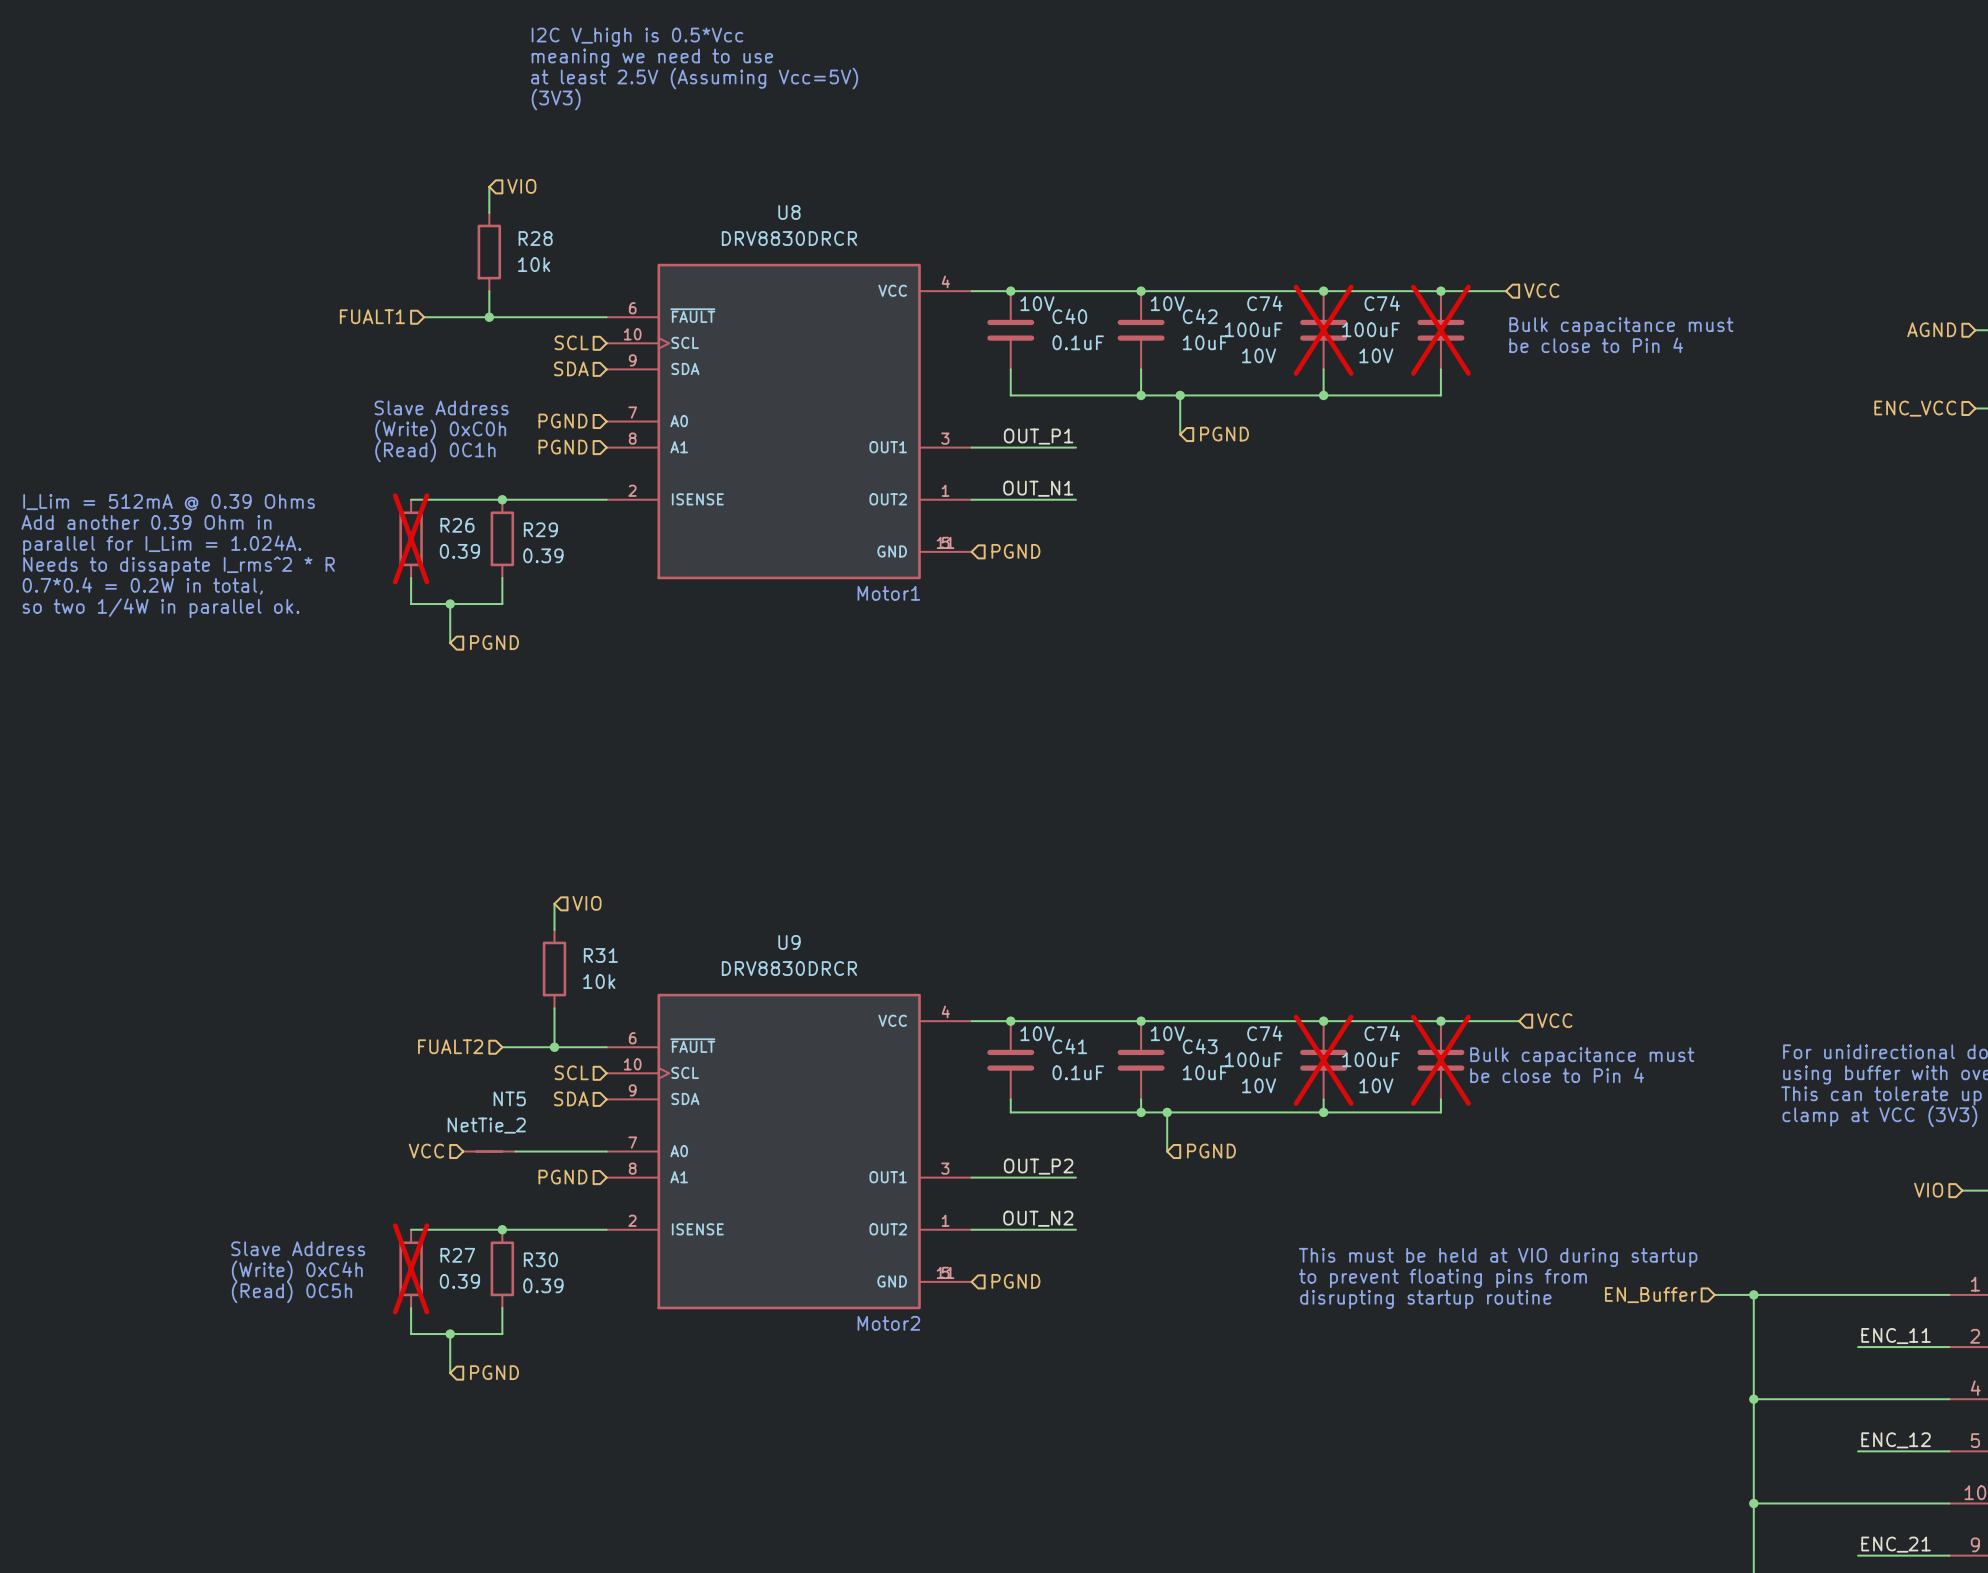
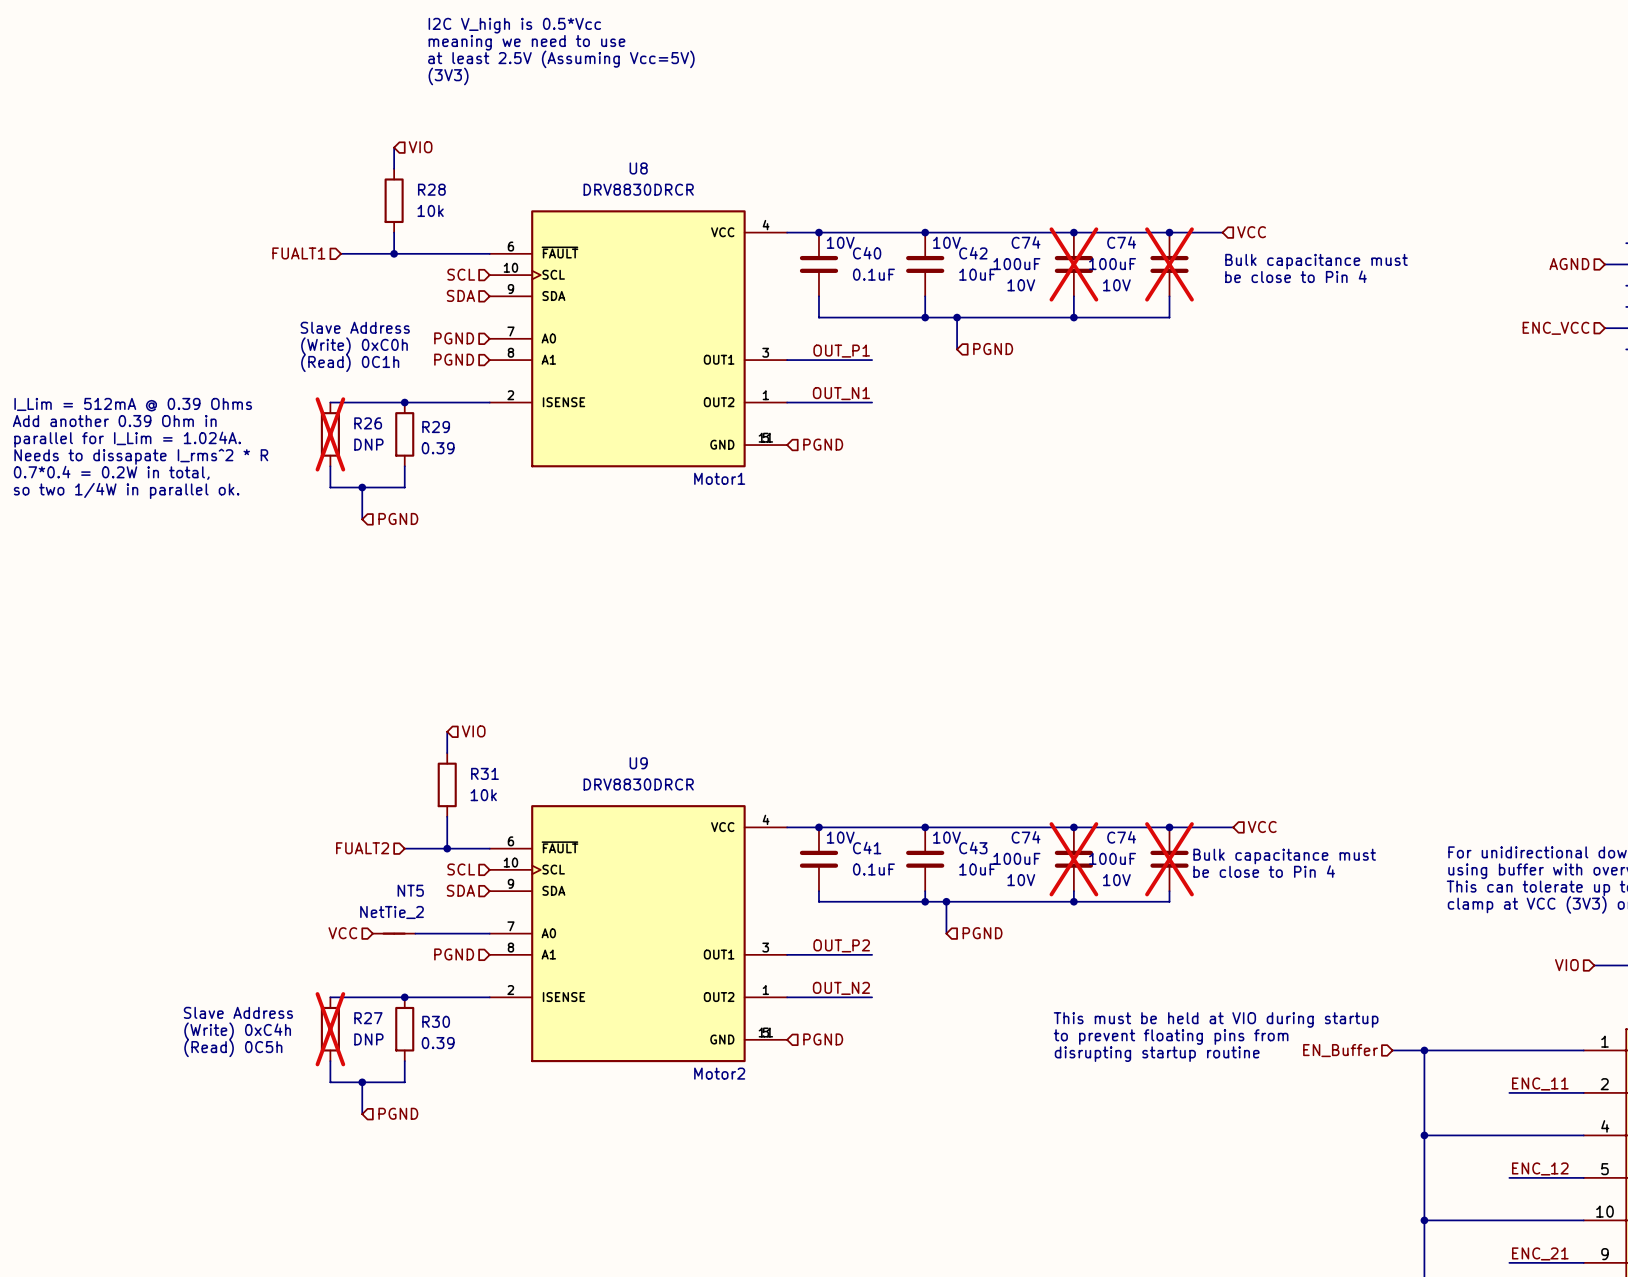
R26 value: 0.39 (459, 551) -> DNP (368, 444)
R27 value: 0.39 (459, 1281) -> DNP (368, 1039)

